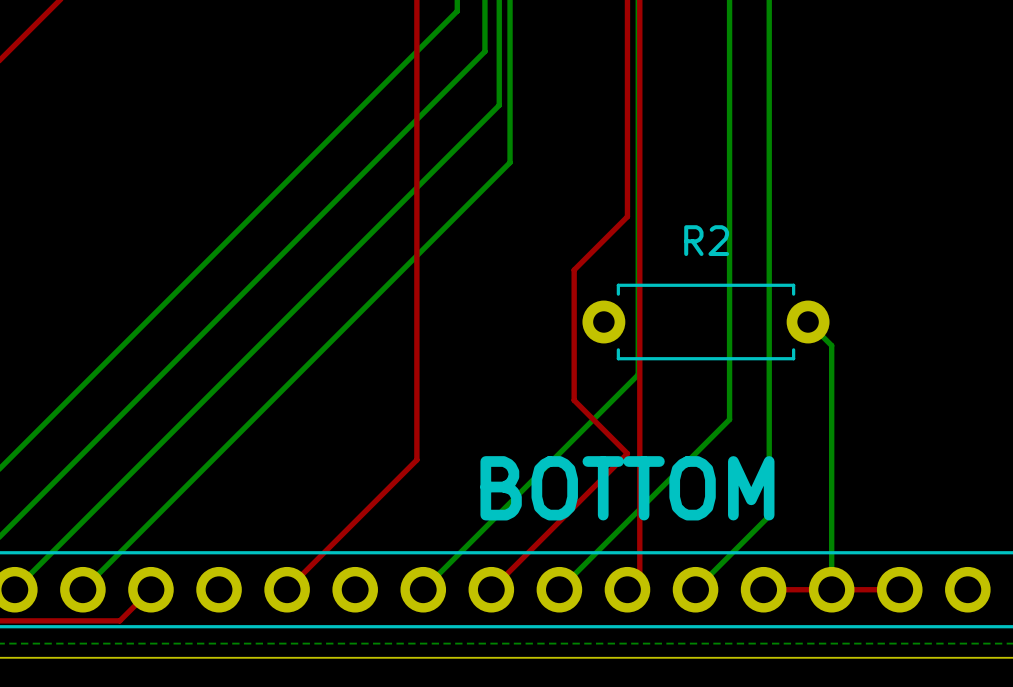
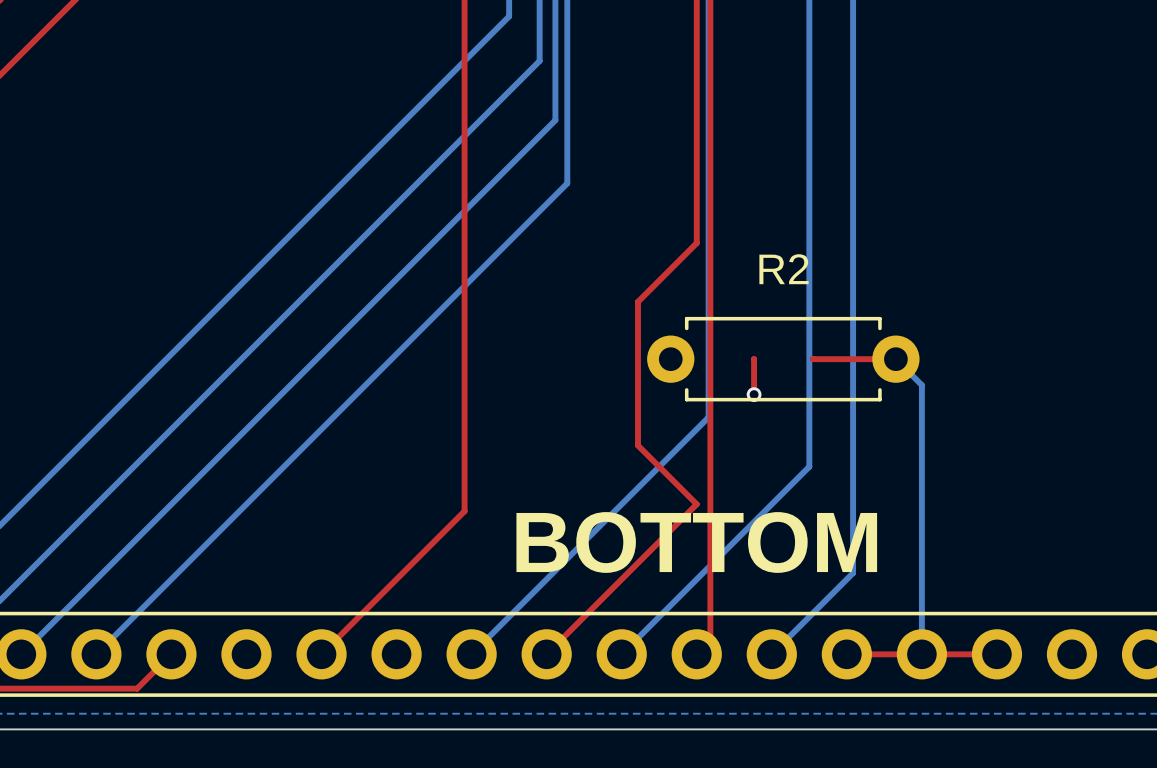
top track: none -> (754, 359) (754, 394)
top track: none -> (812, 359) (895, 359)
via: none -> (754, 394)

